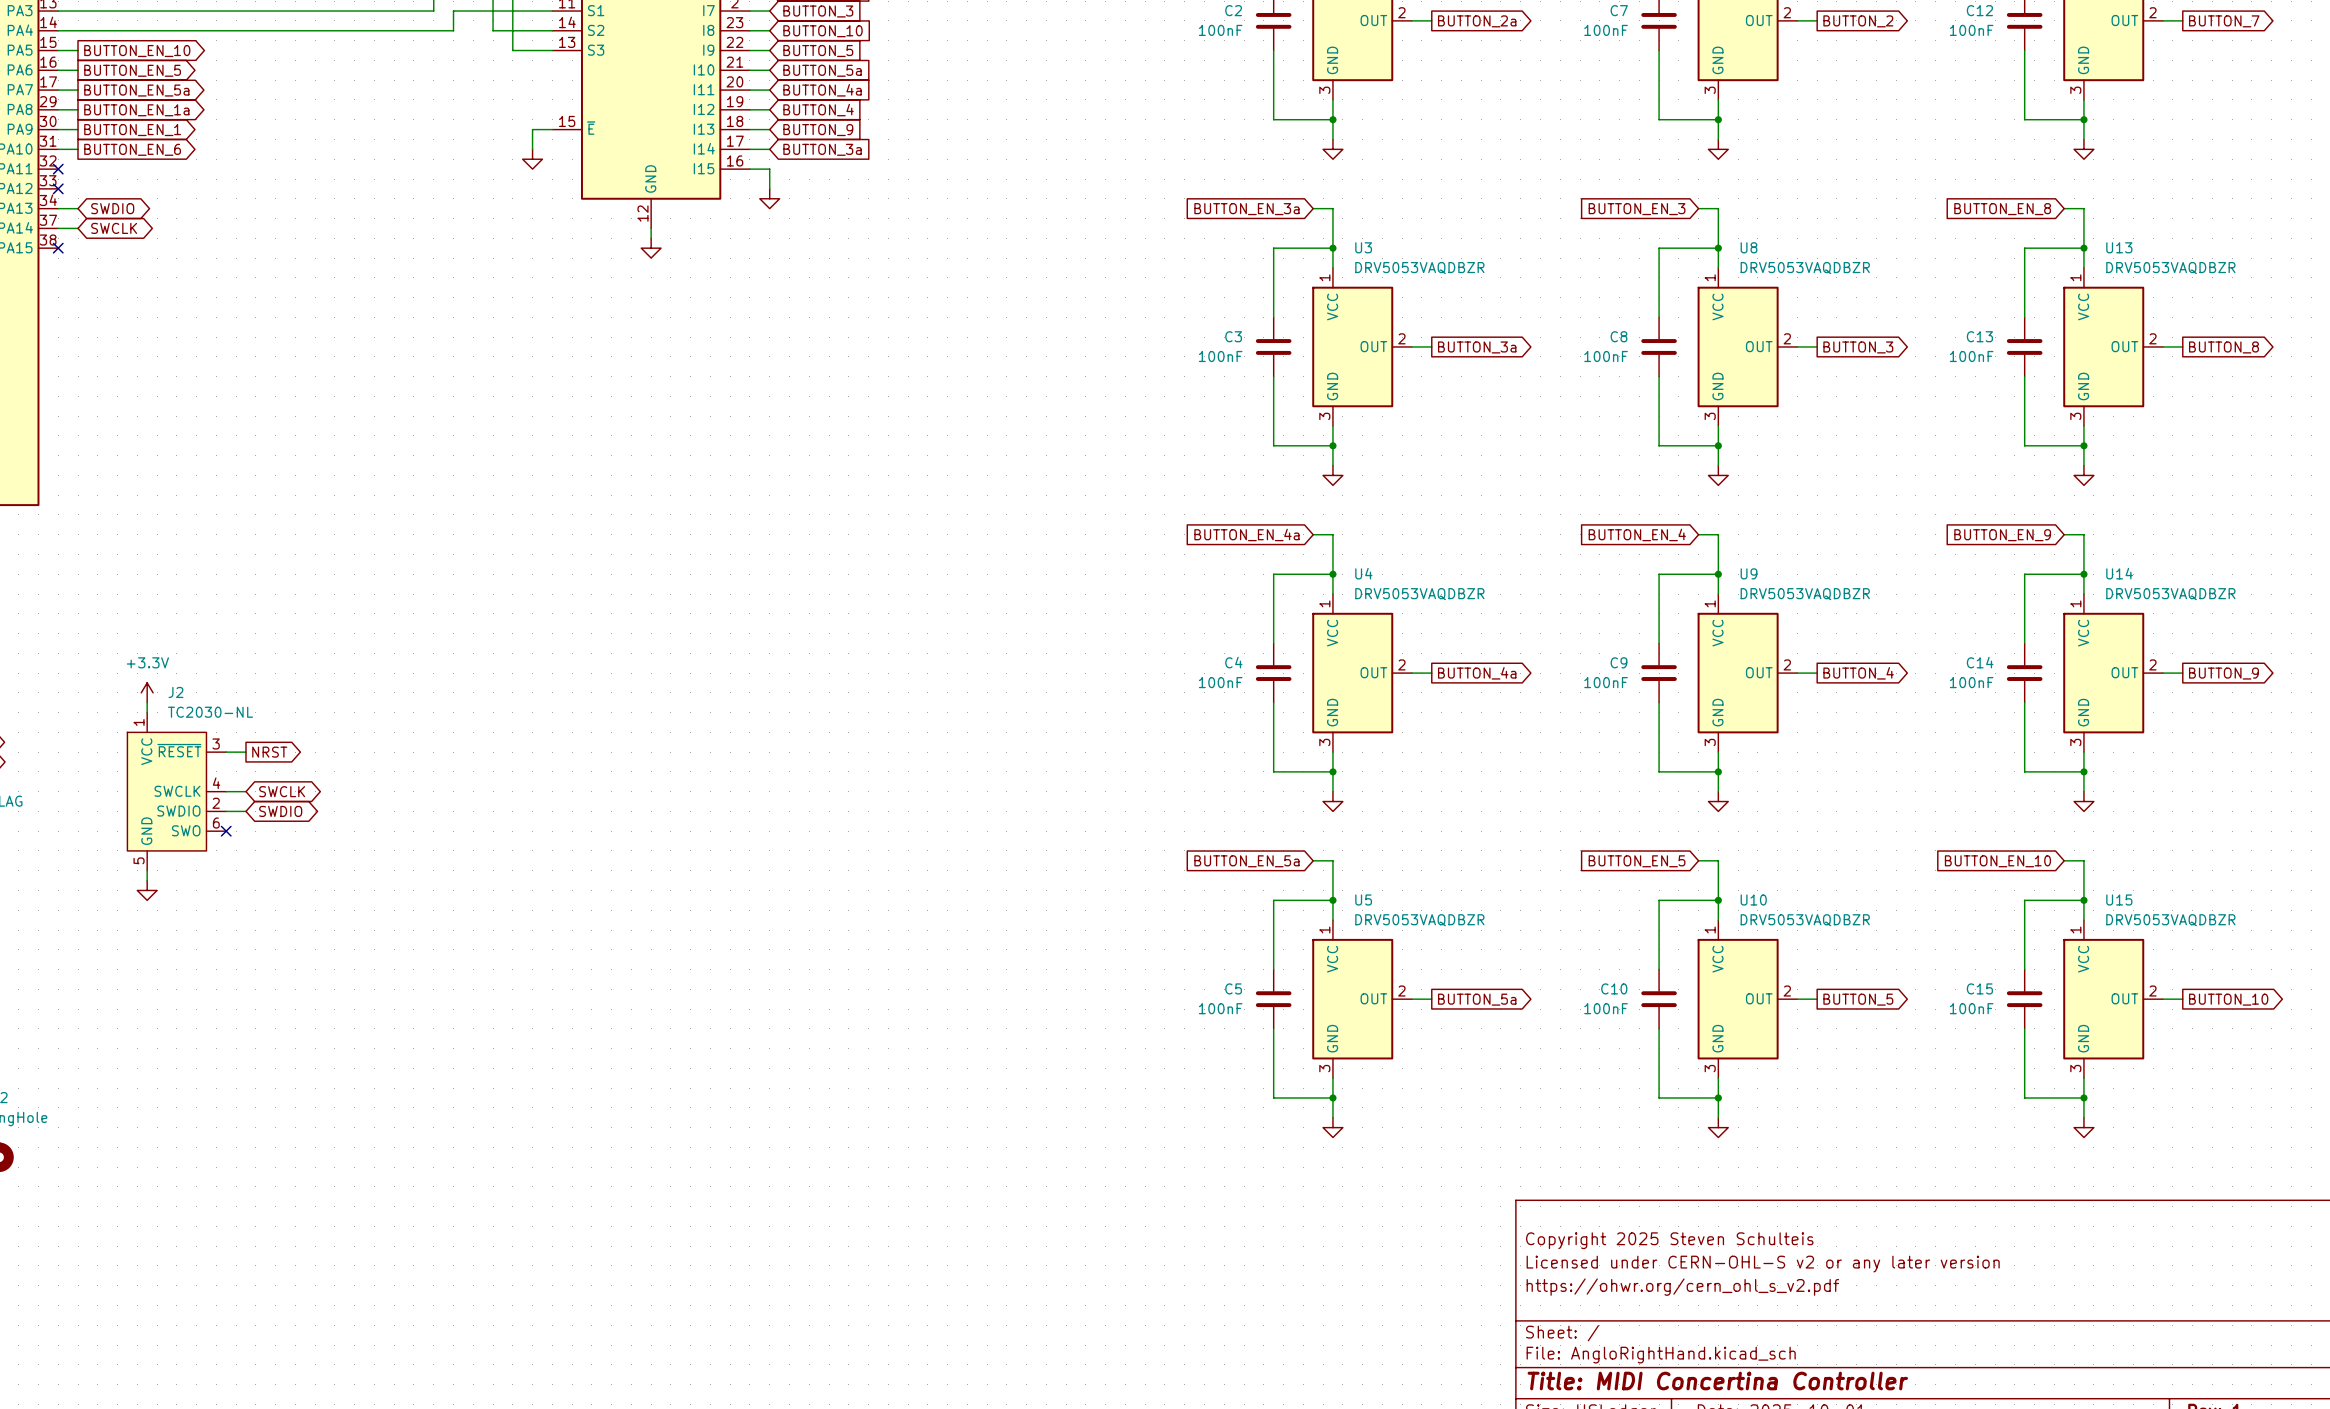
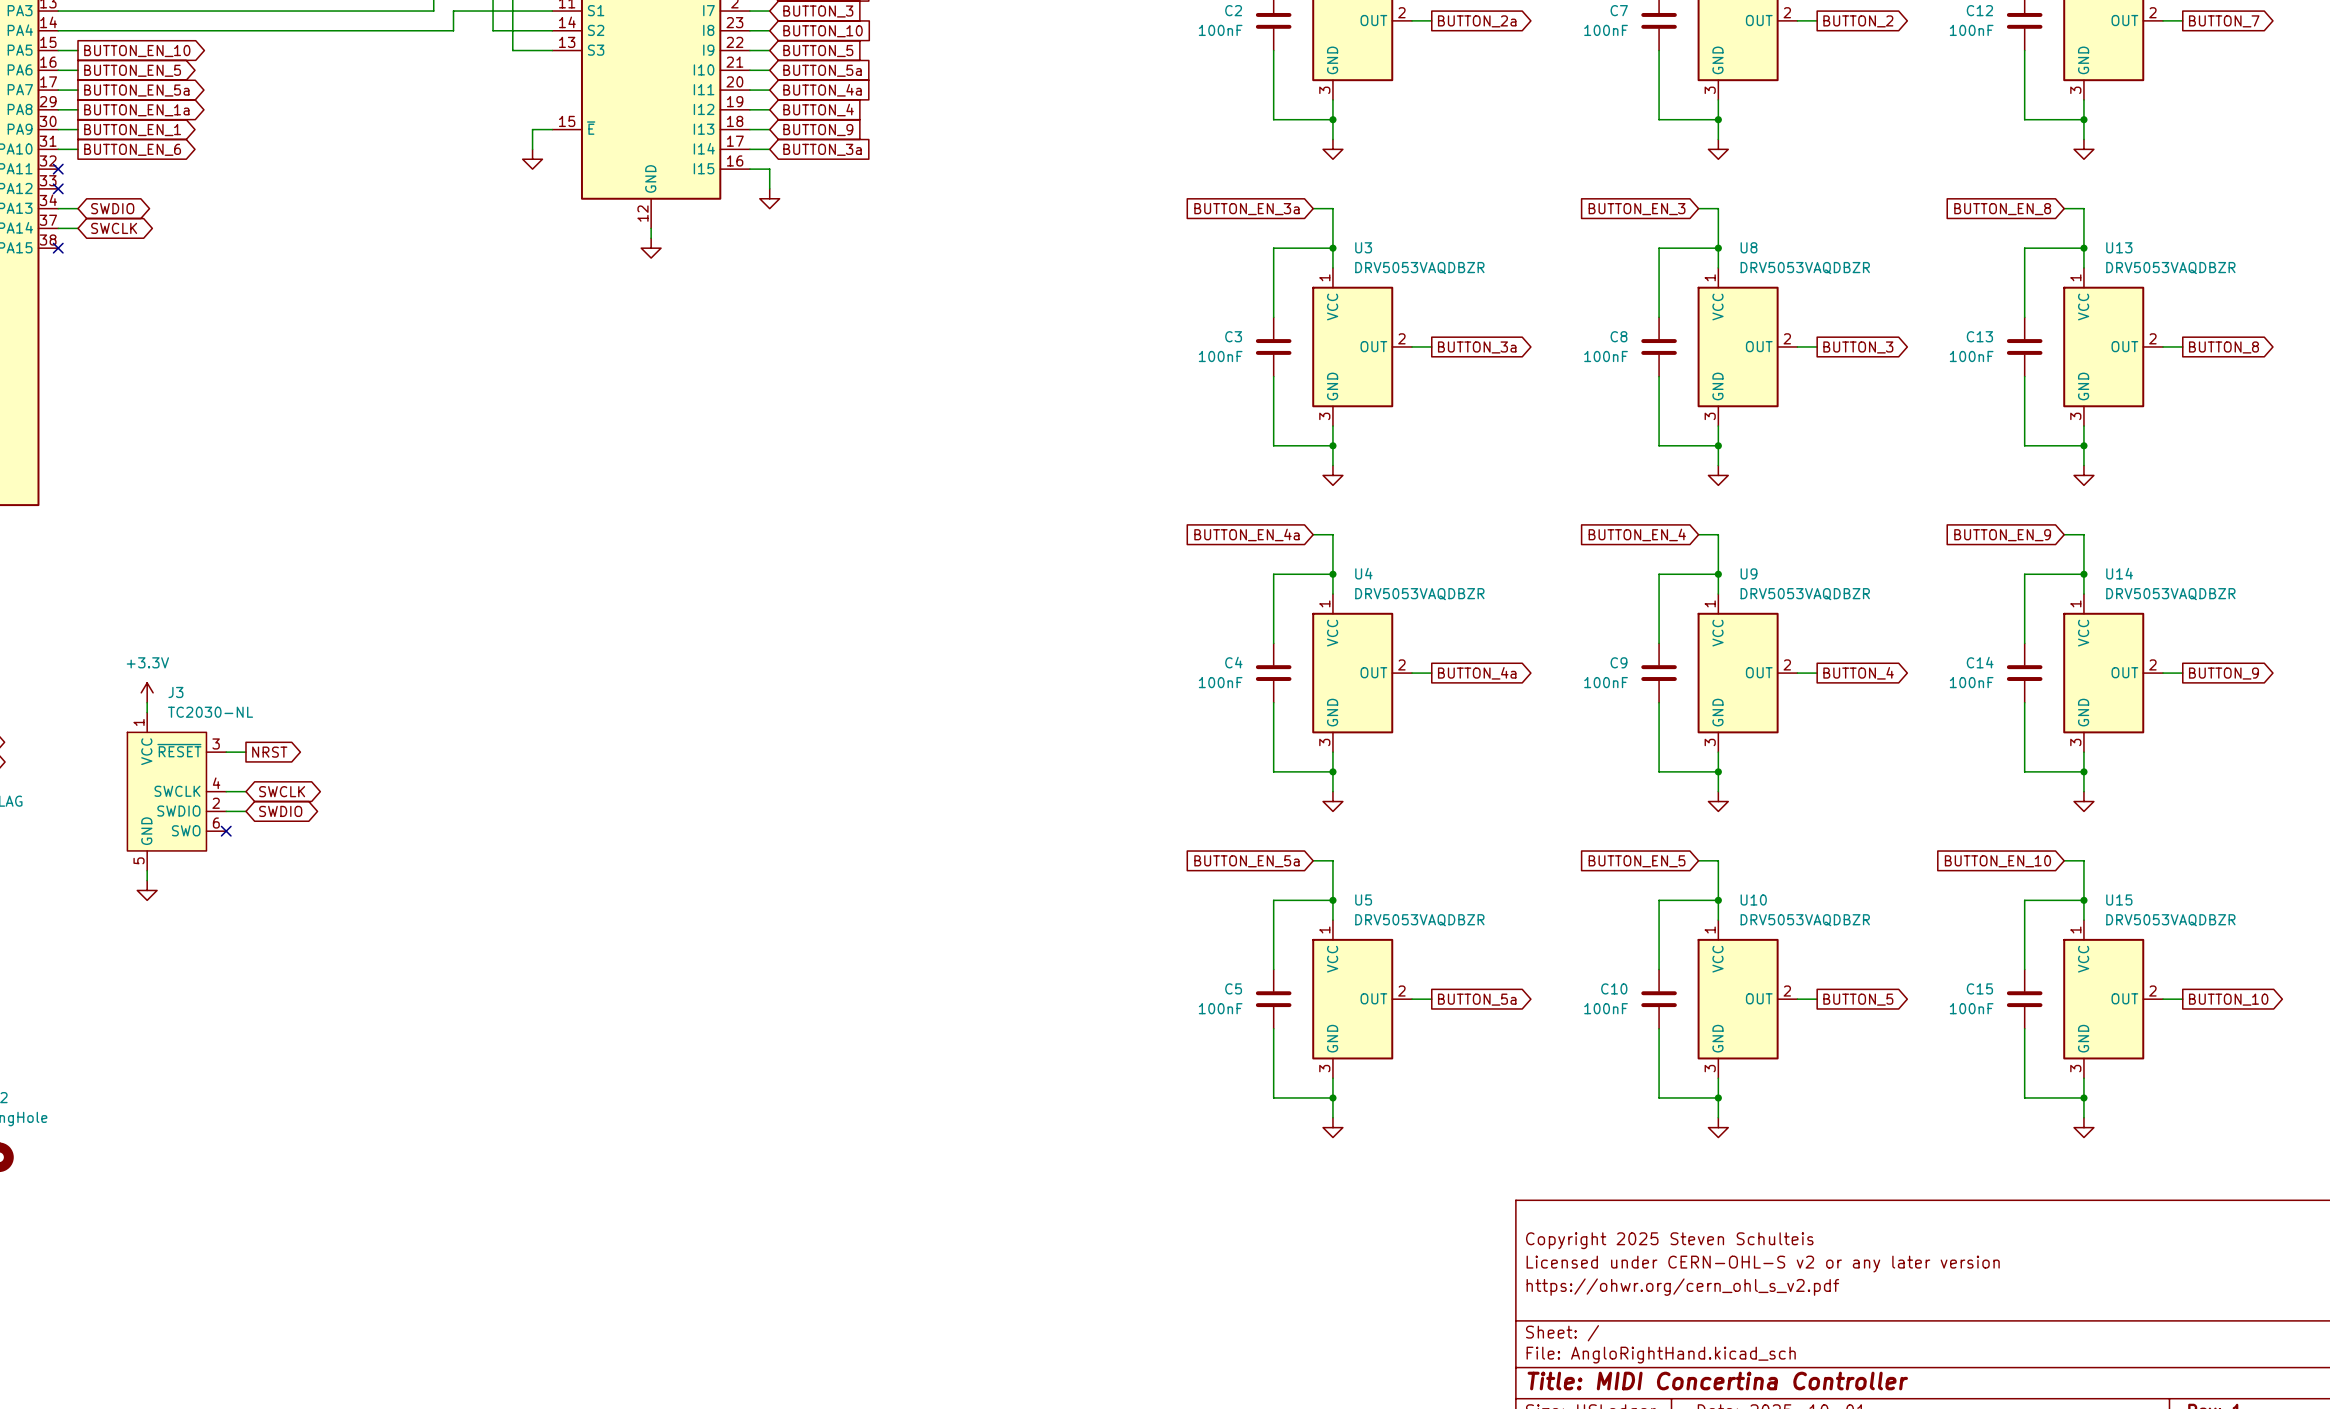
J2 name: J2 (175, 692) -> J3 (175, 692)

